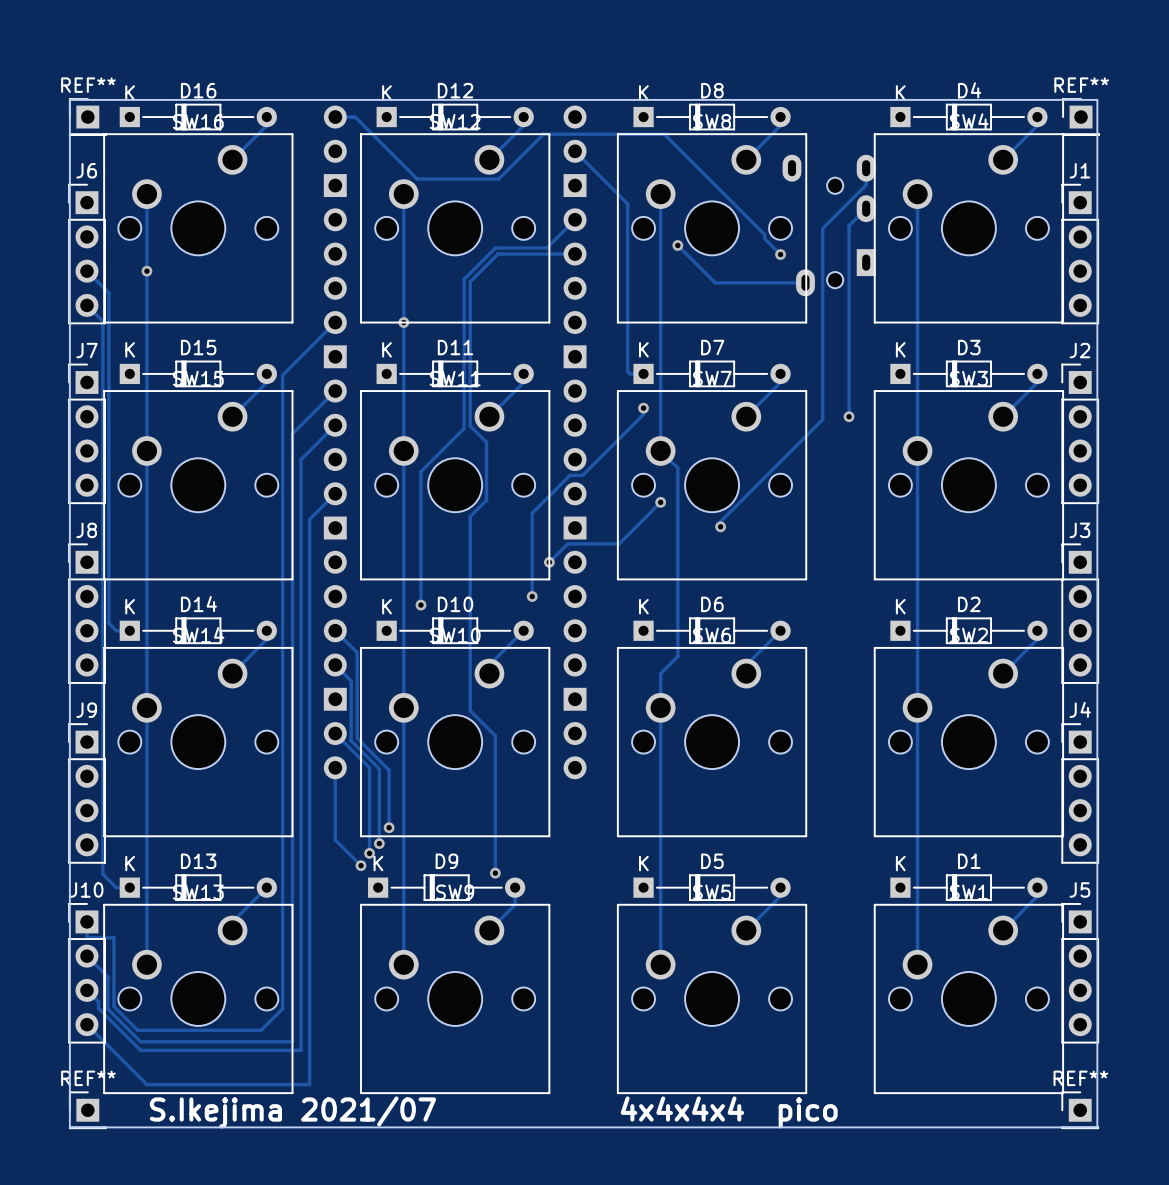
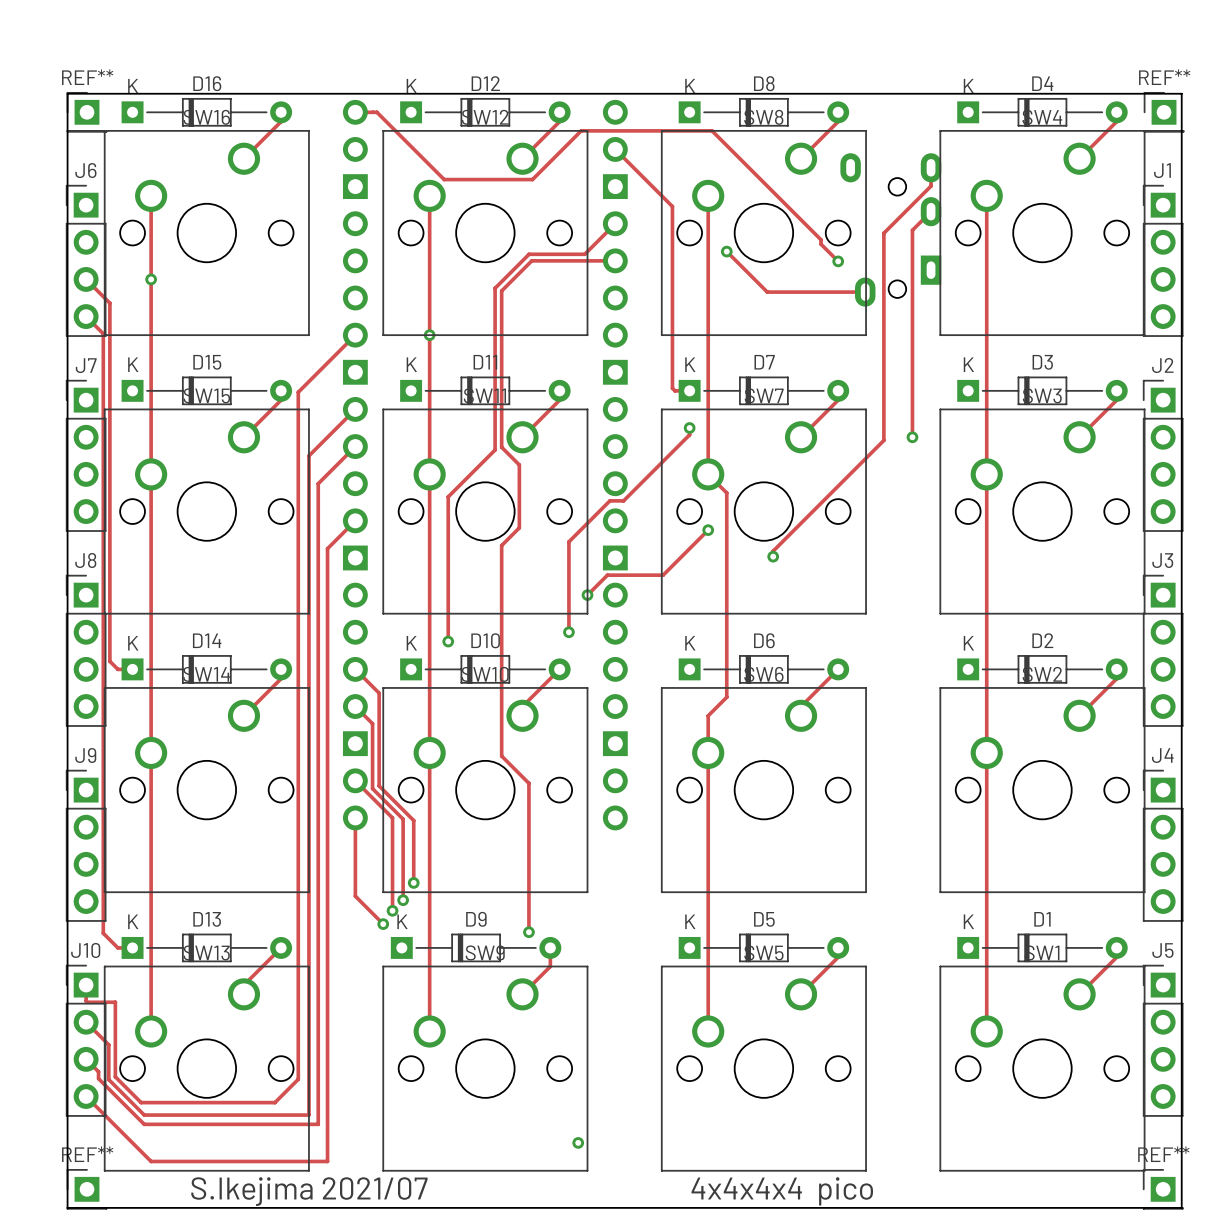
via: none -> (578, 1142)

